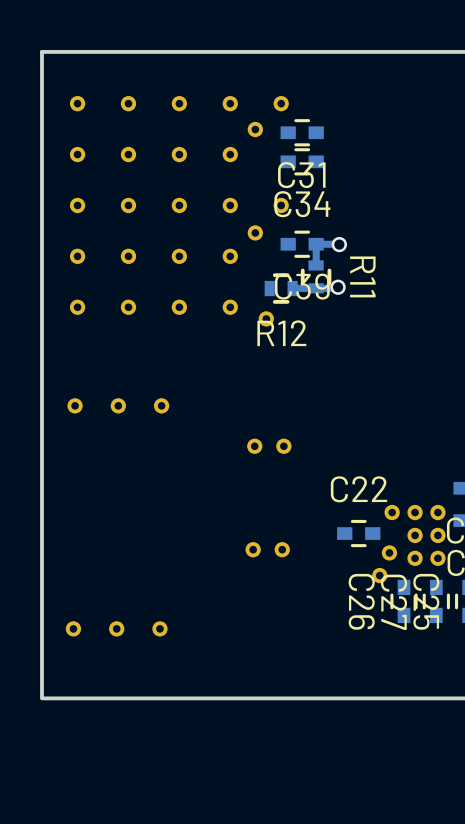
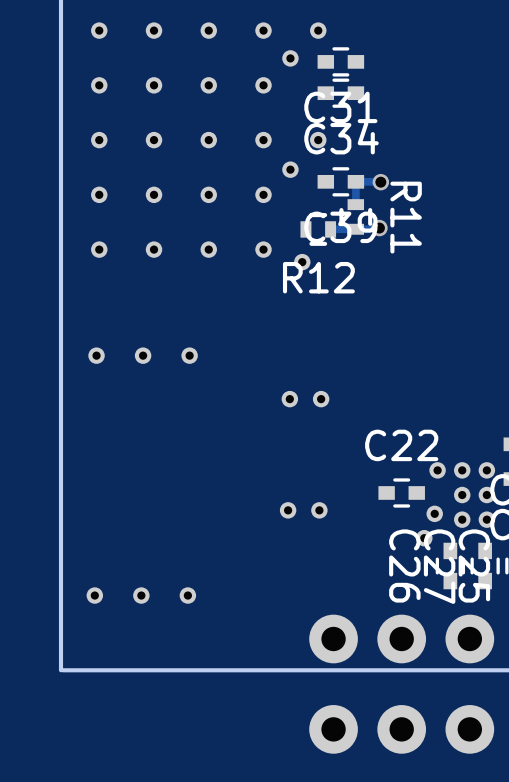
part: none -> (401, 684)

